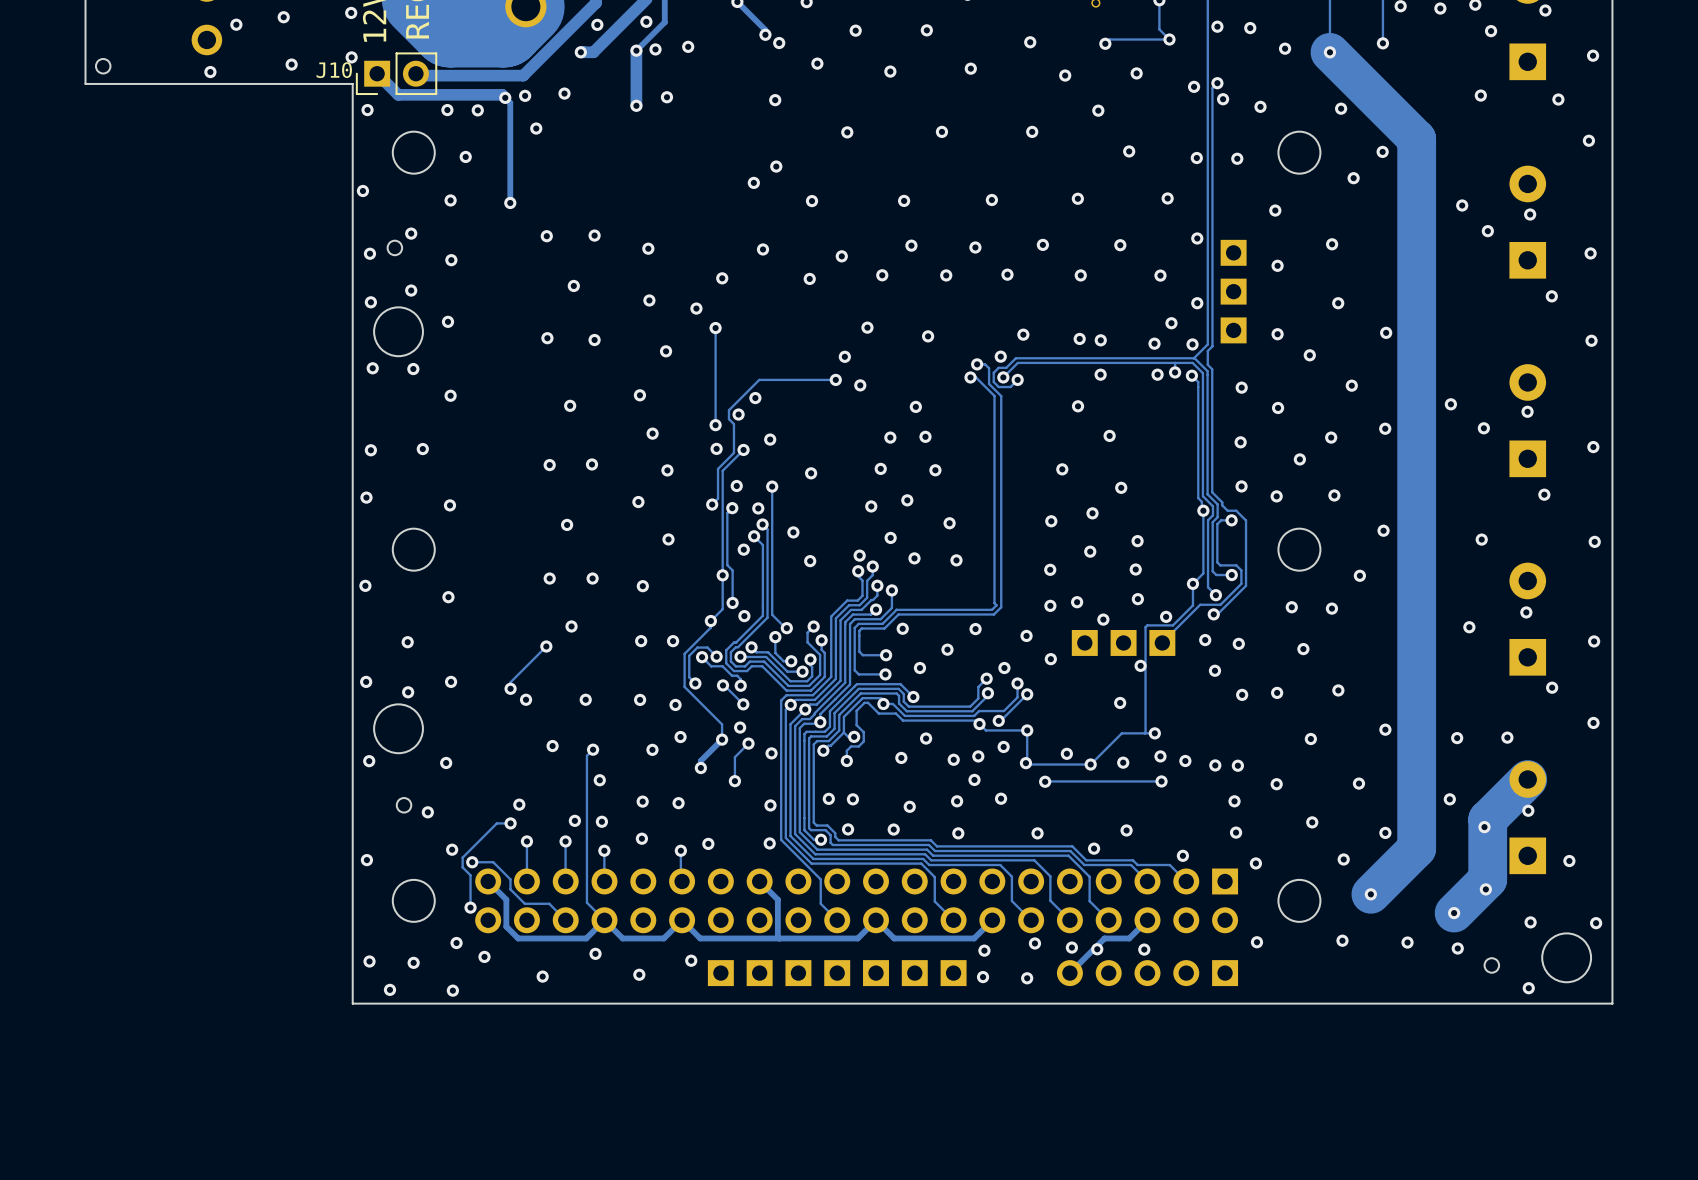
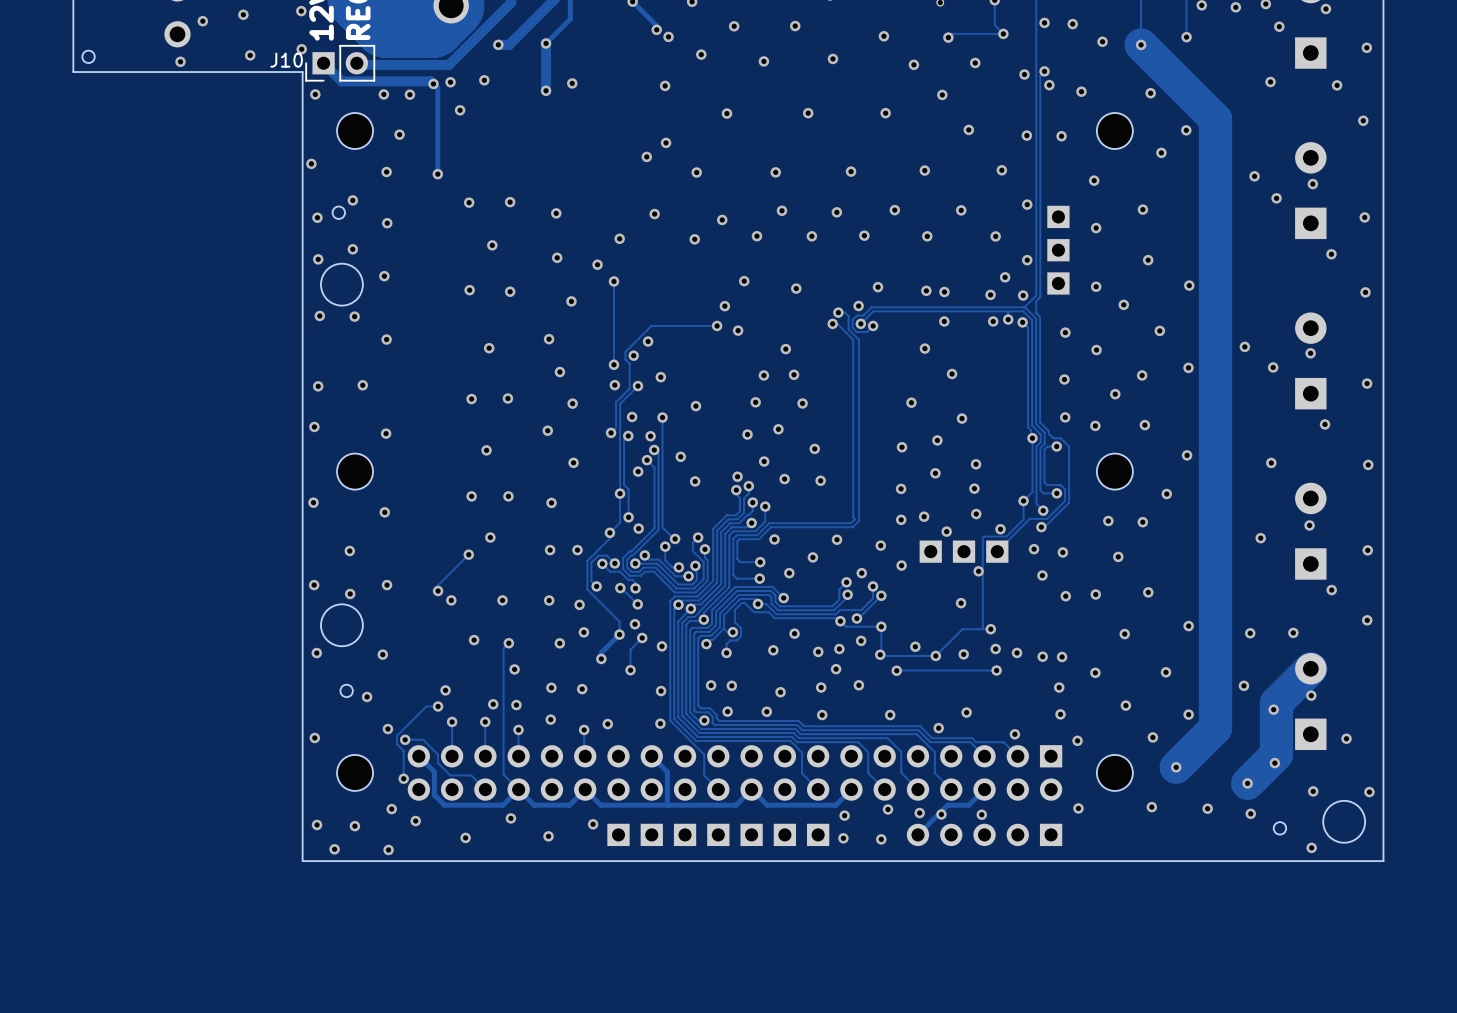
via: (646, 21) -> none
via: (597, 24) -> none
via: (688, 46) -> none
via: (655, 49) -> none

